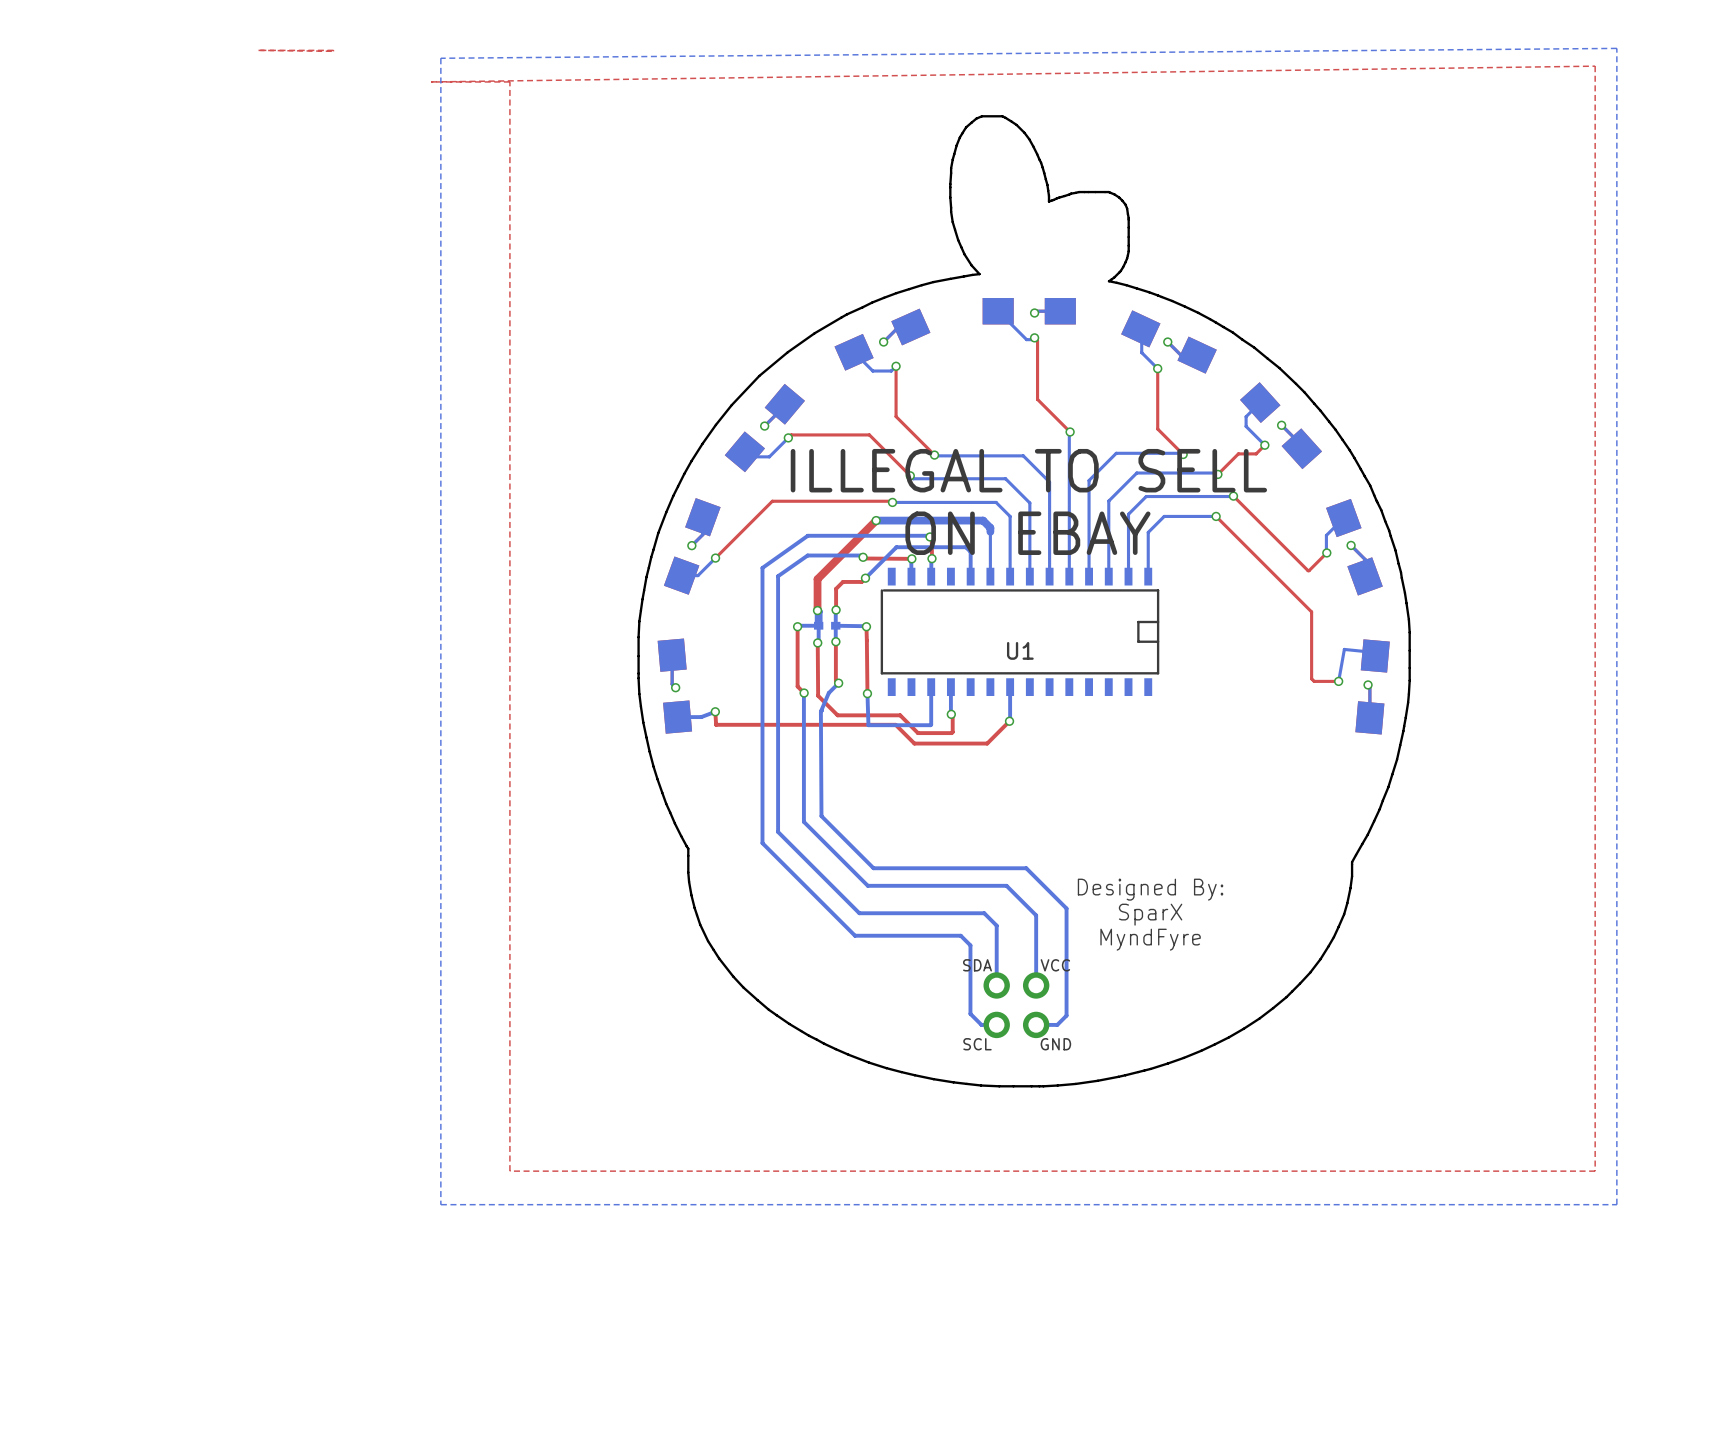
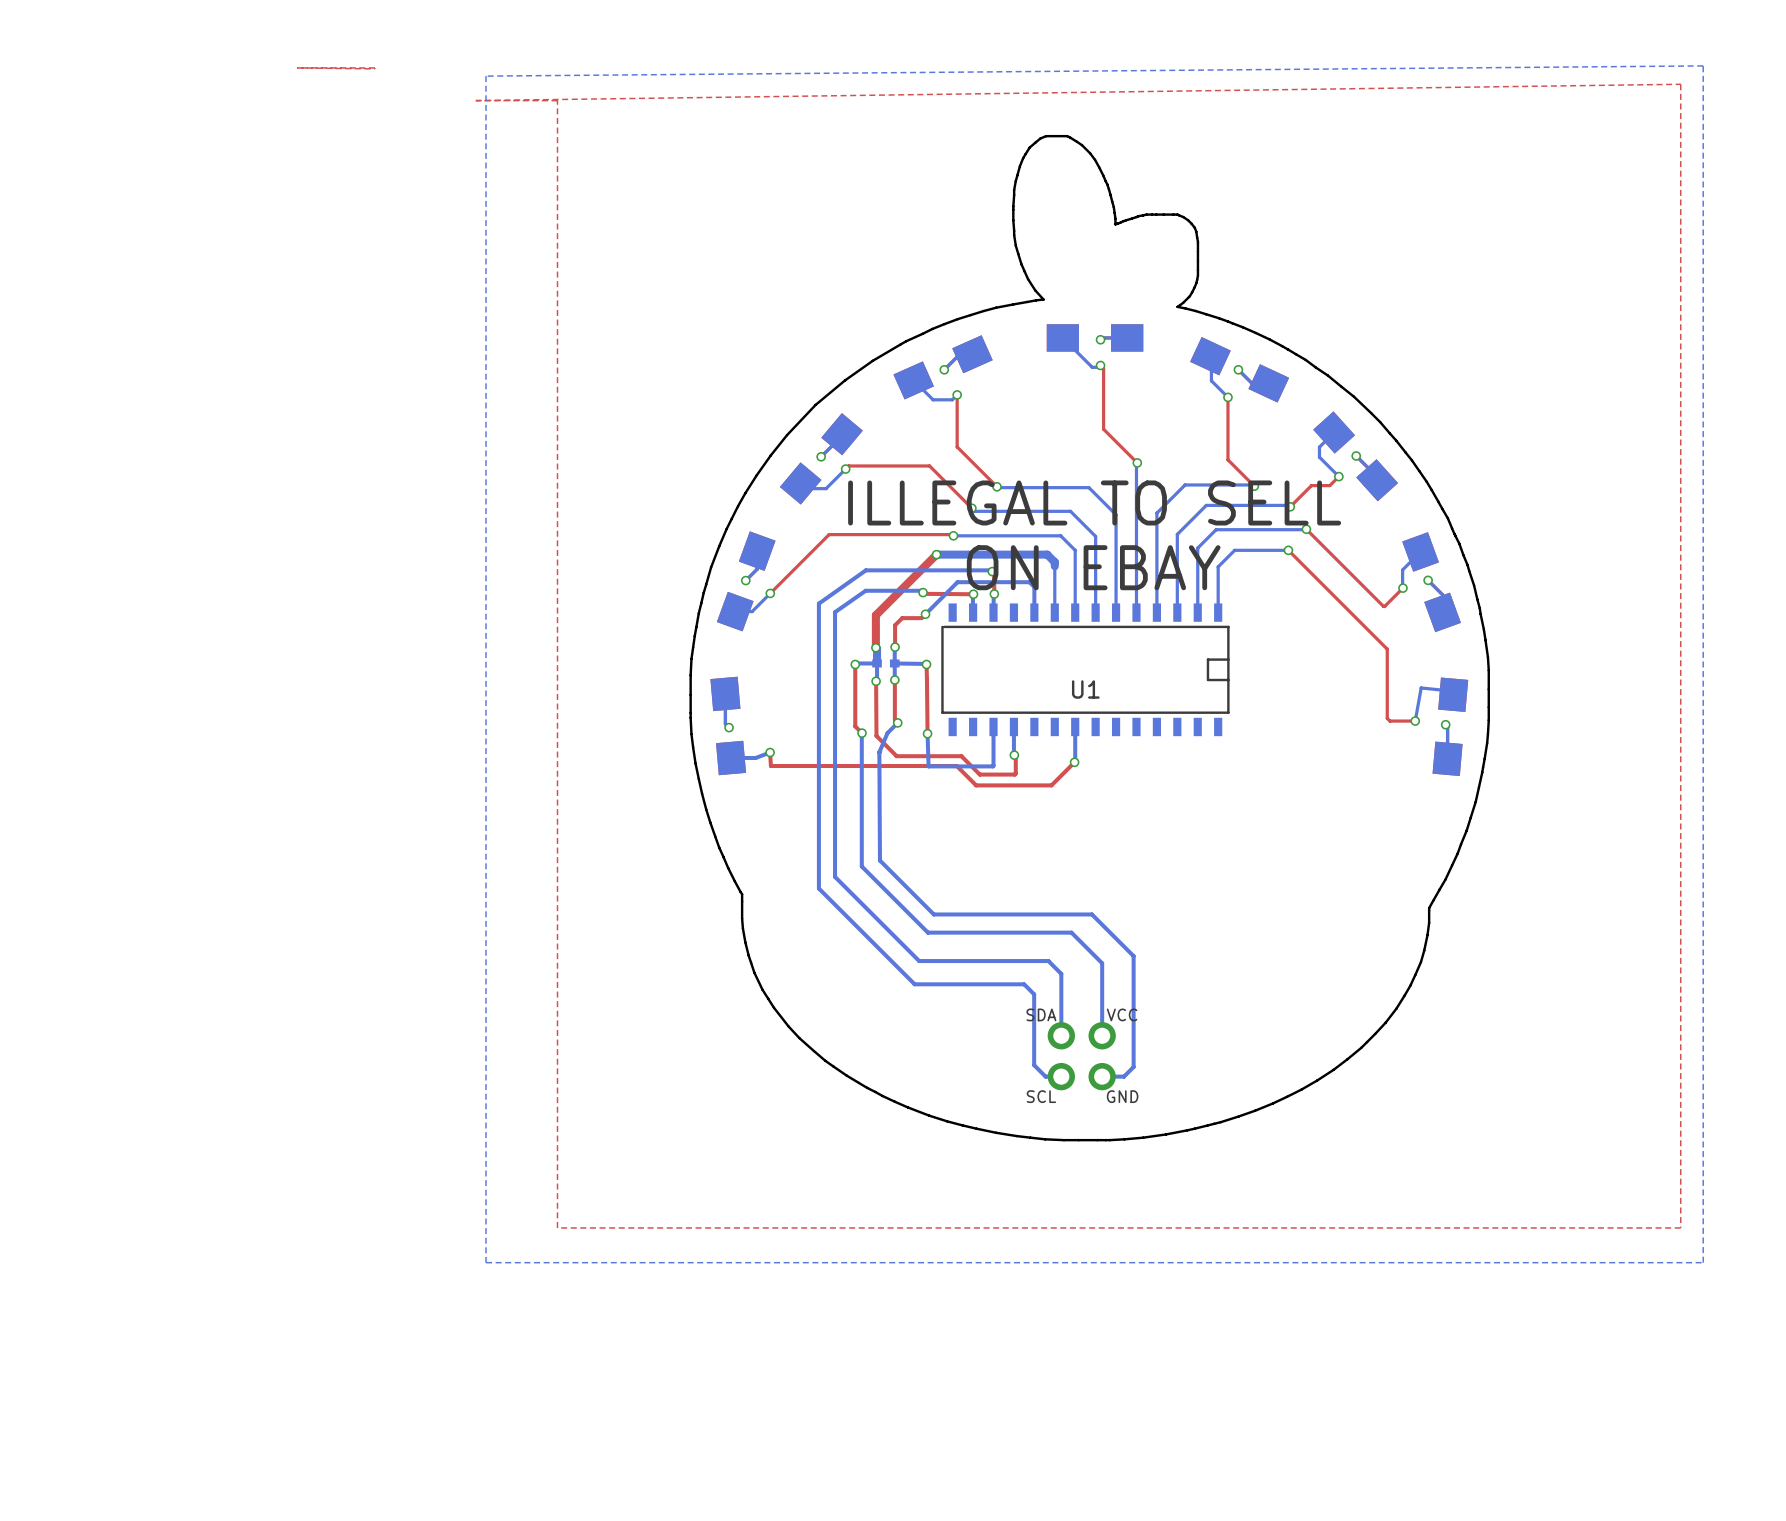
text: Designed By: (1150, 889) -> none
text: SparX (1150, 914) -> none
text: MyndFyre (1150, 939) -> none

